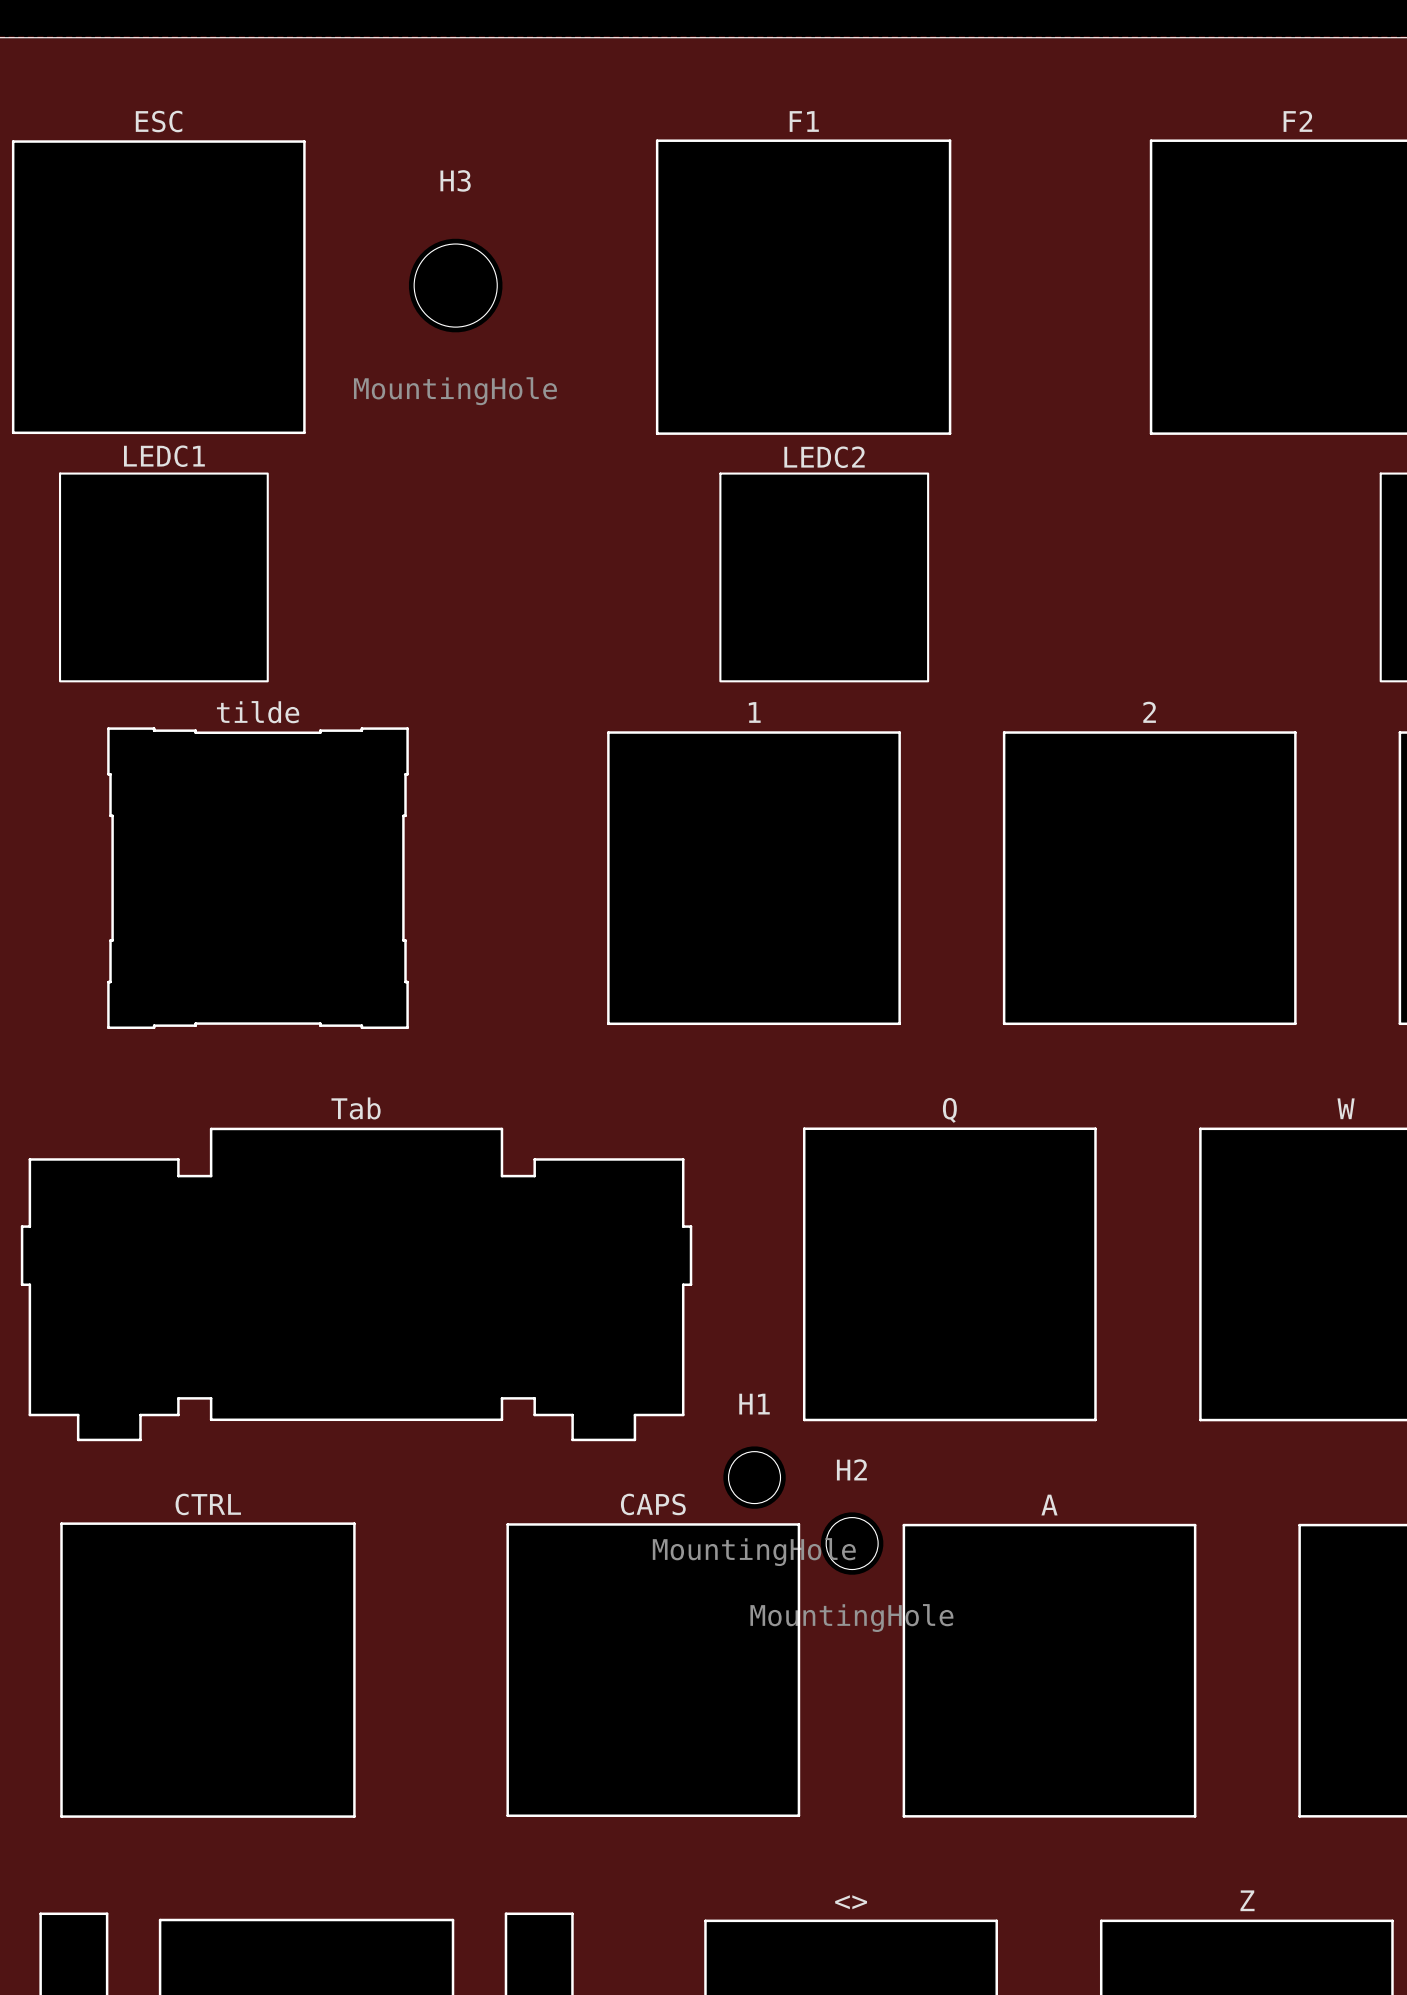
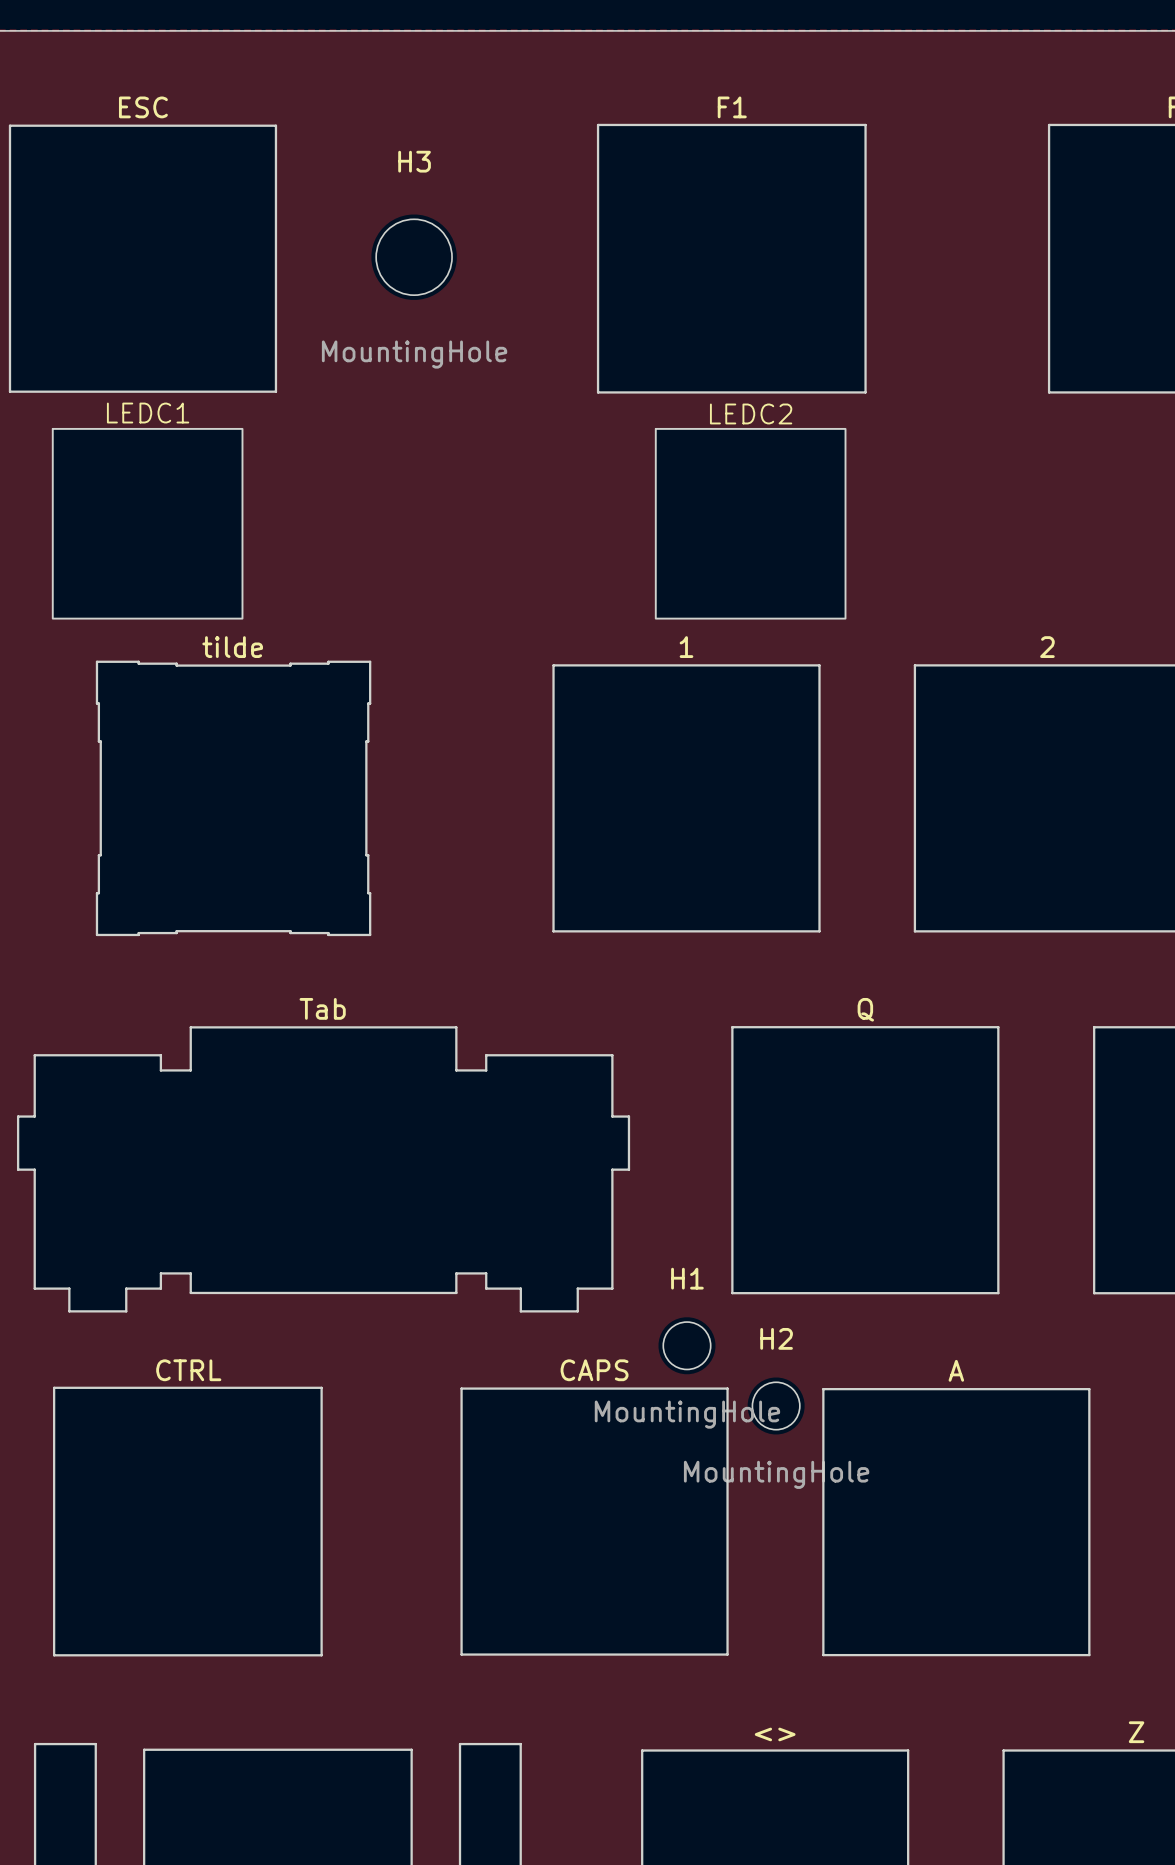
drawing shape: [20, 1097, 693, 1442] -> [16, 997, 631, 1313]

